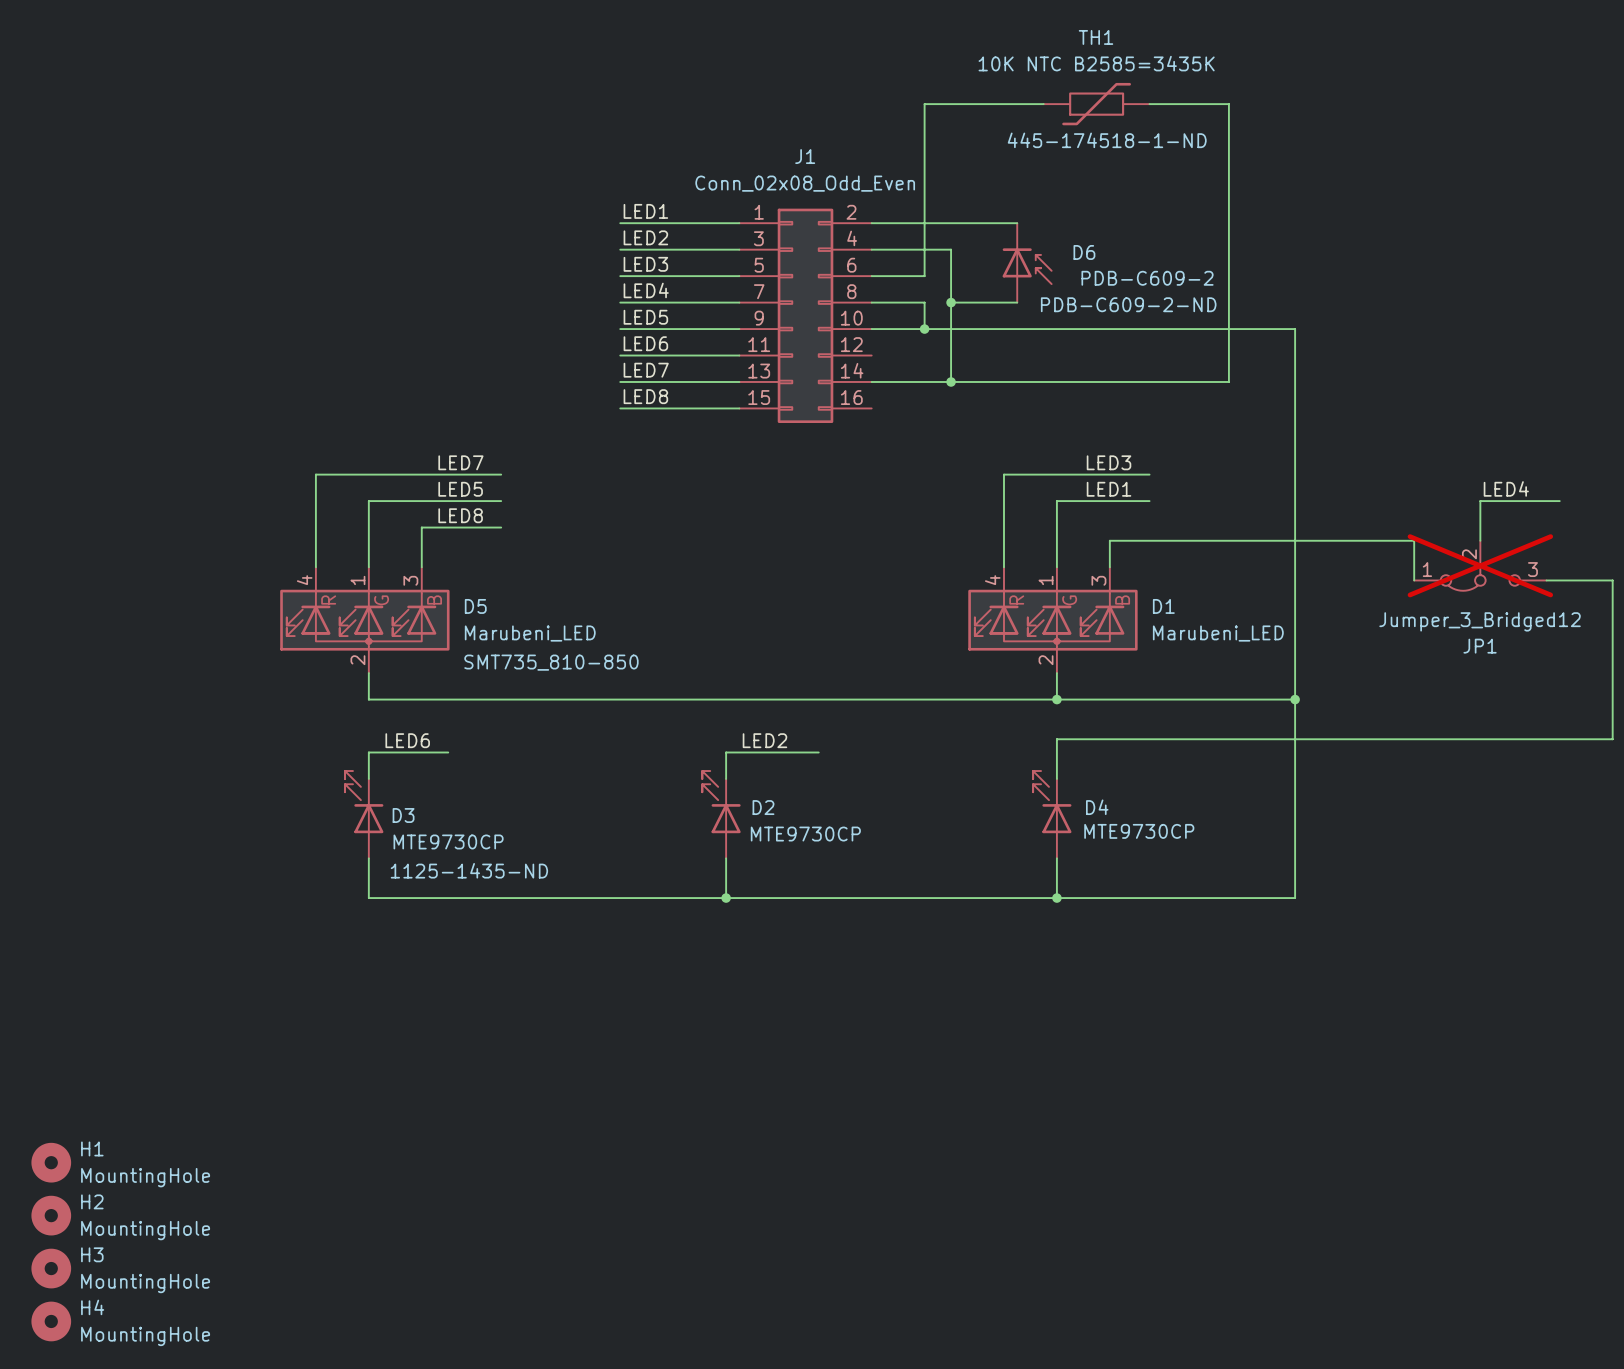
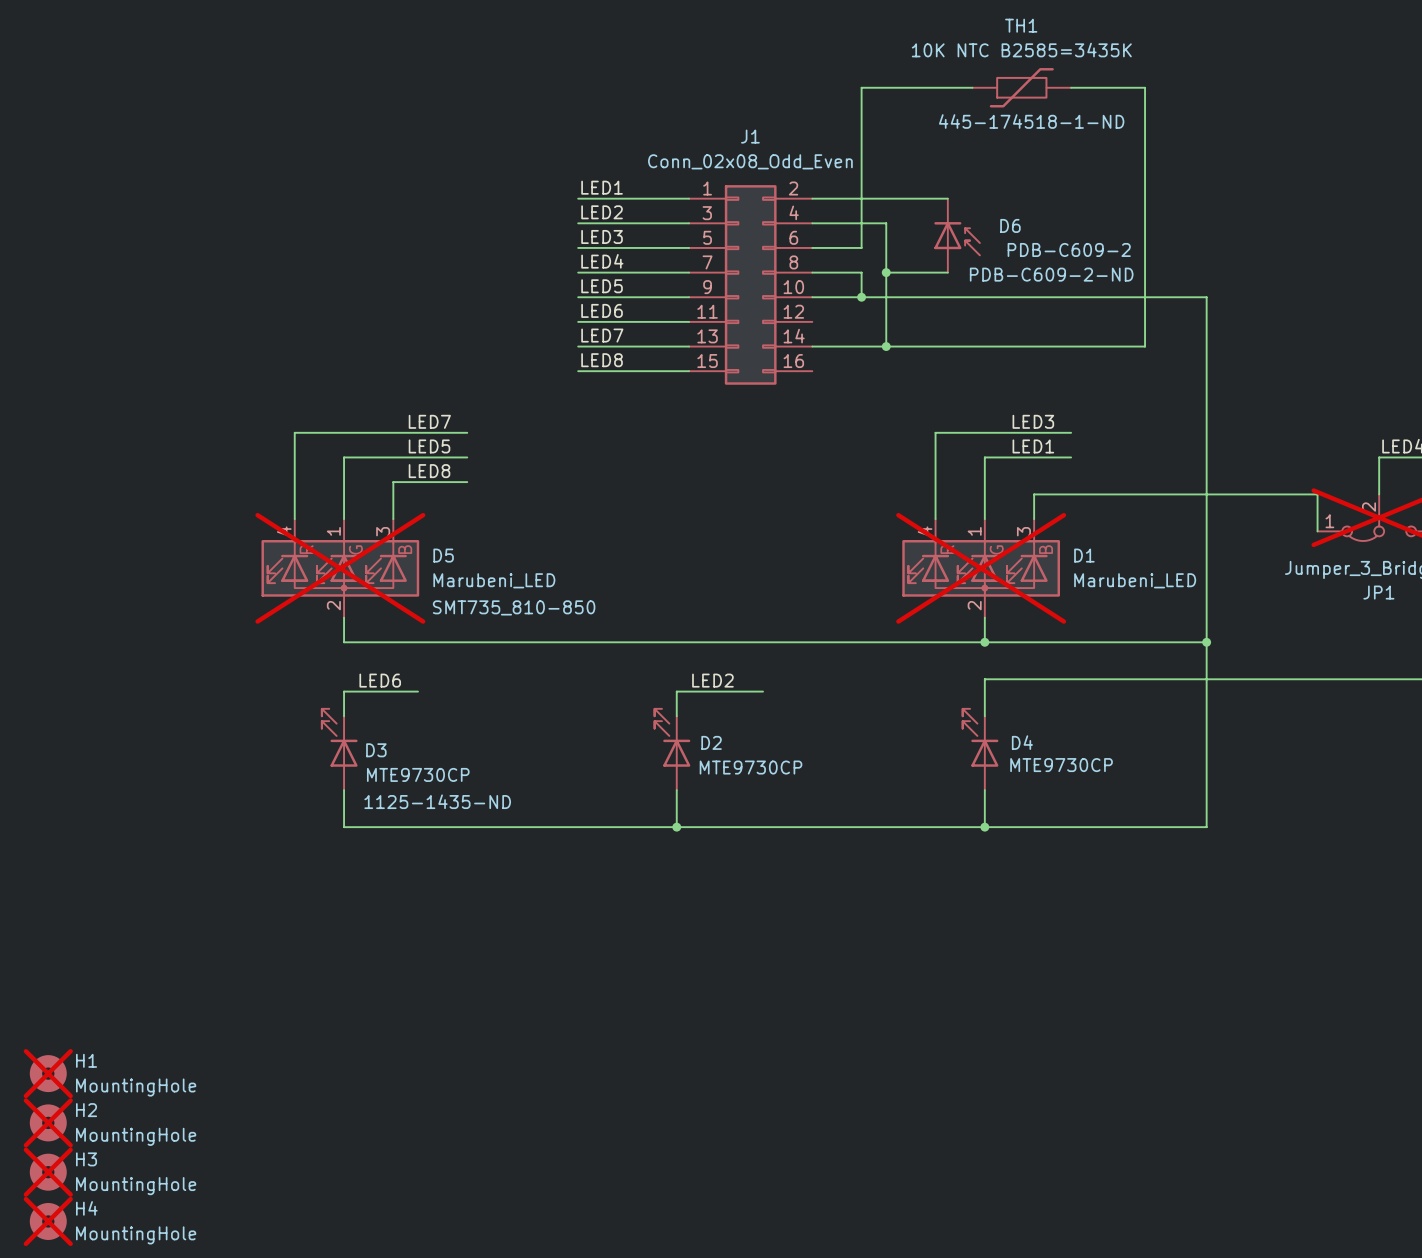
D5 do-not-place cross: none -> (340, 568)
D1 do-not-place cross: none -> (981, 568)
H1 do-not-place cross: none -> (48, 1073)
H2 do-not-place cross: none -> (48, 1122)
H3 do-not-place cross: none -> (48, 1172)
H4 do-not-place cross: none -> (48, 1221)

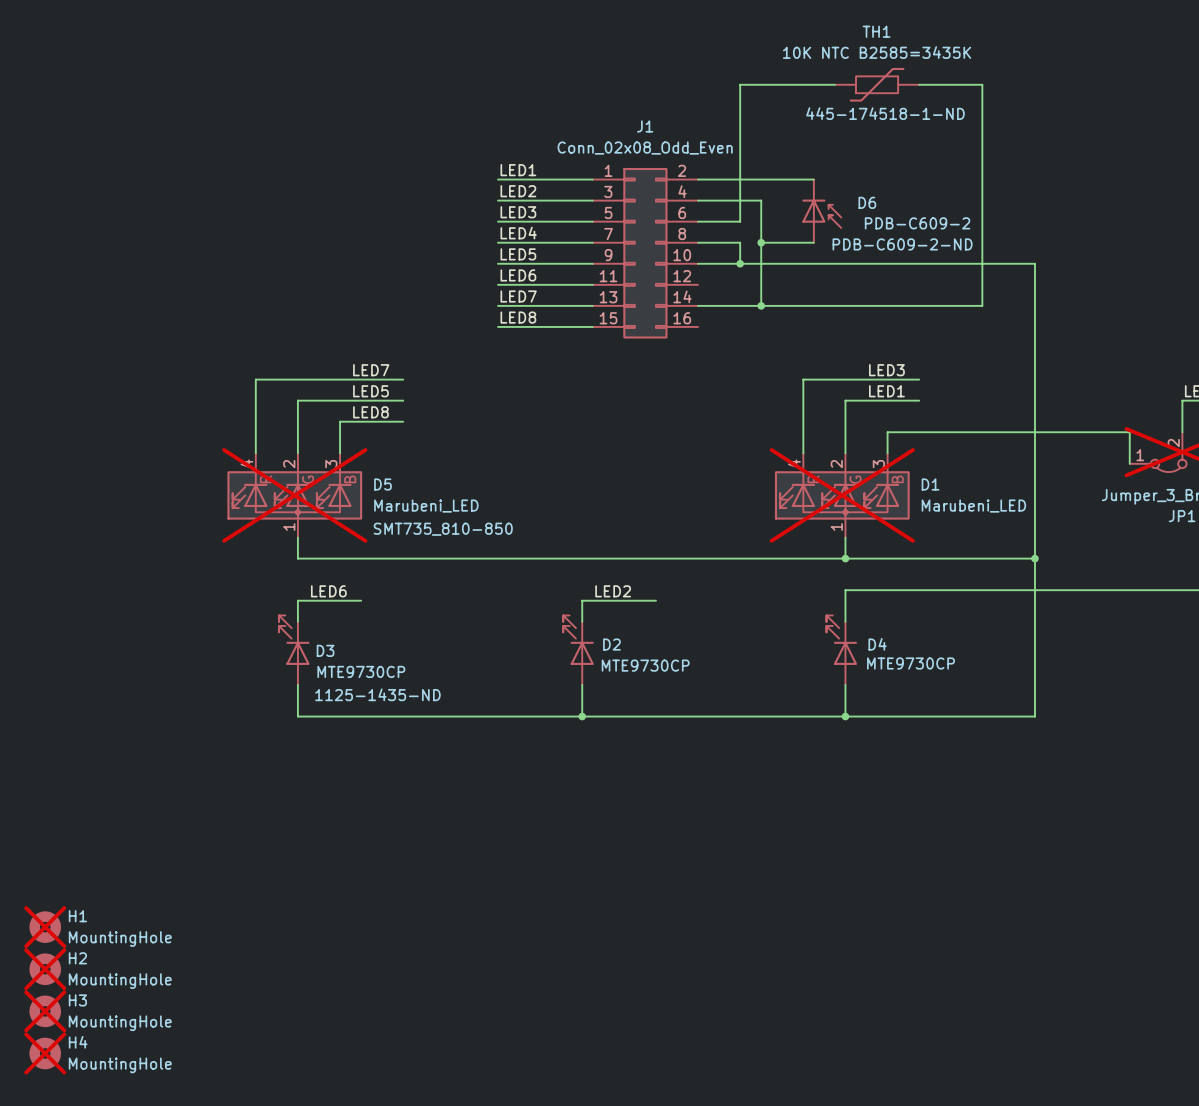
D5 pin number: 1 (333, 531) -> 2 (289, 464)
D1 pin number: 1 (974, 531) -> 2 (836, 464)
D5 pin number: 2 (333, 605) -> 1 (289, 527)
D1 pin number: 2 (974, 605) -> 1 (836, 527)

